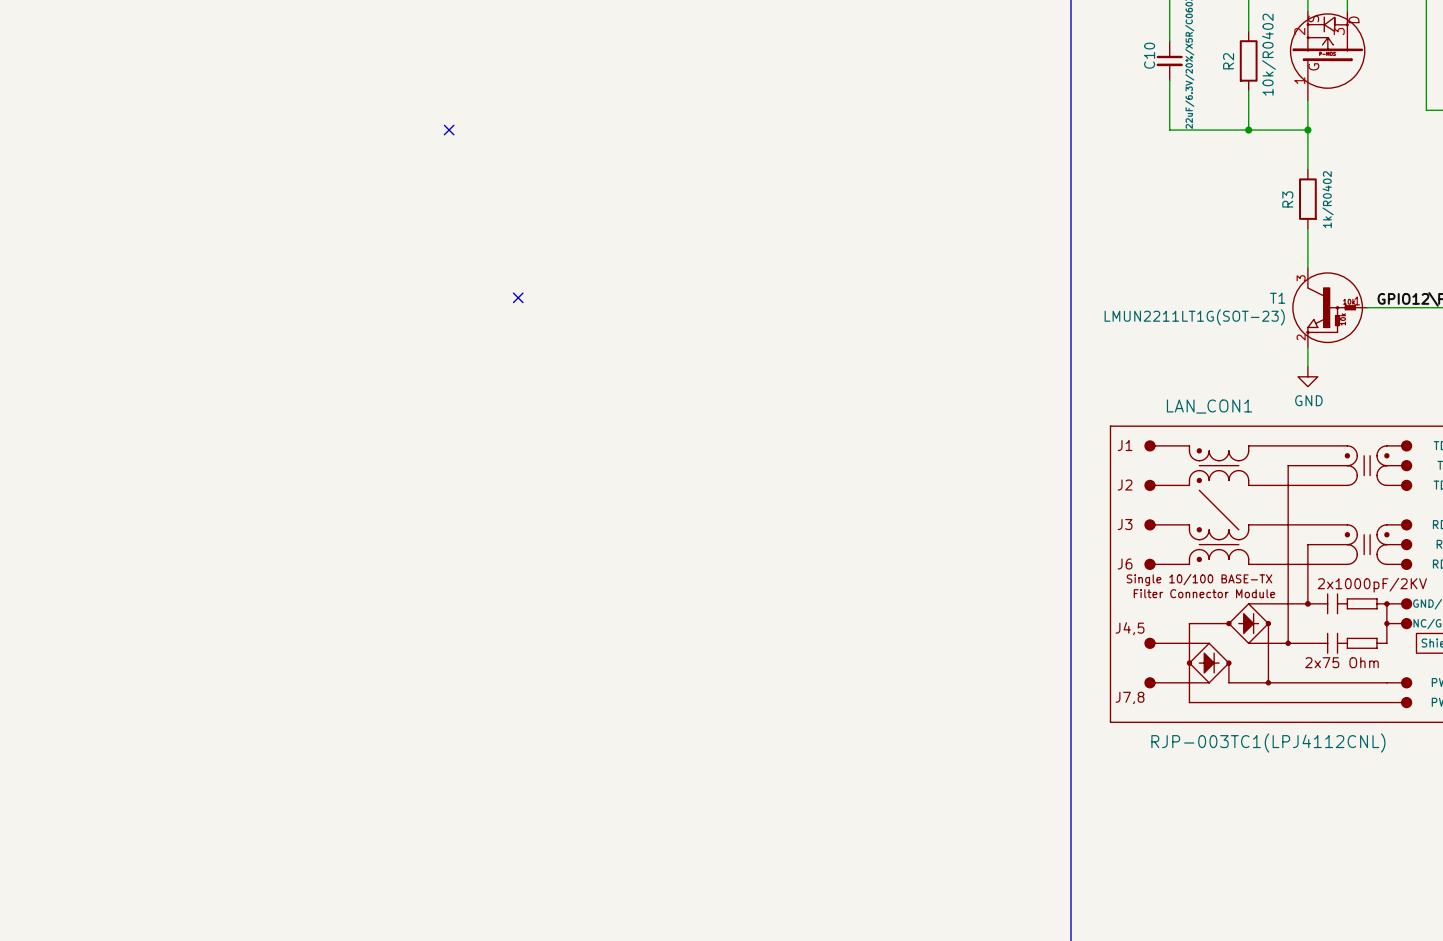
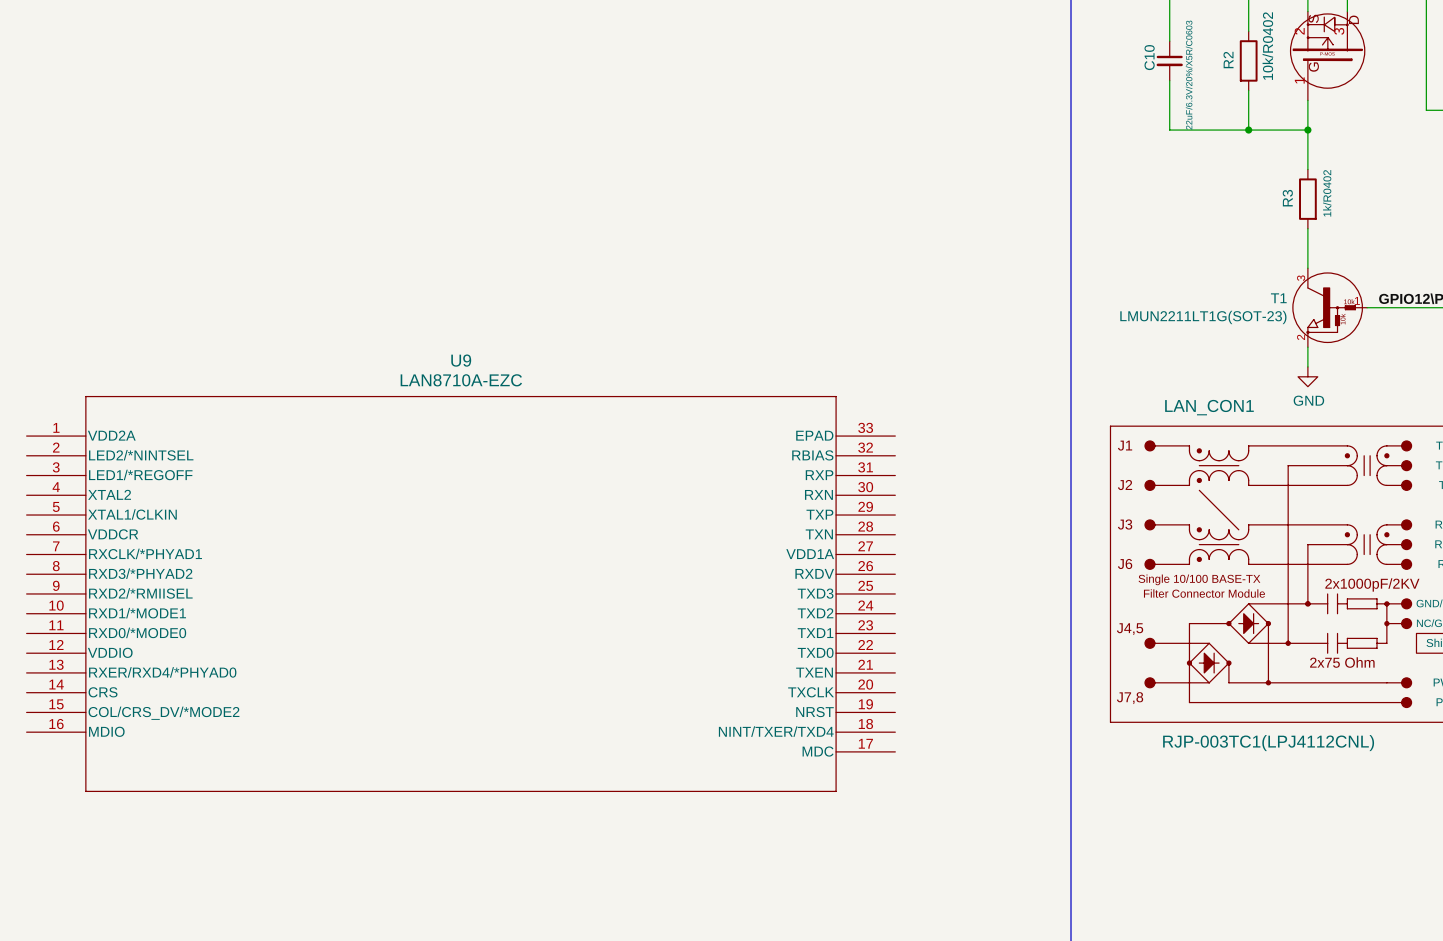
no-connect mark: (449, 130) -> none
no-connect mark: (518, 297) -> none
U9: none -> LAN8710A-EZC (460, 593)

